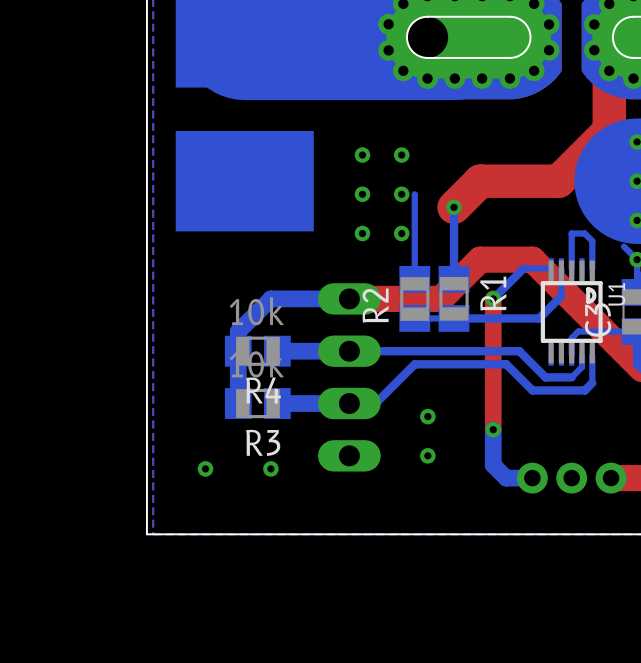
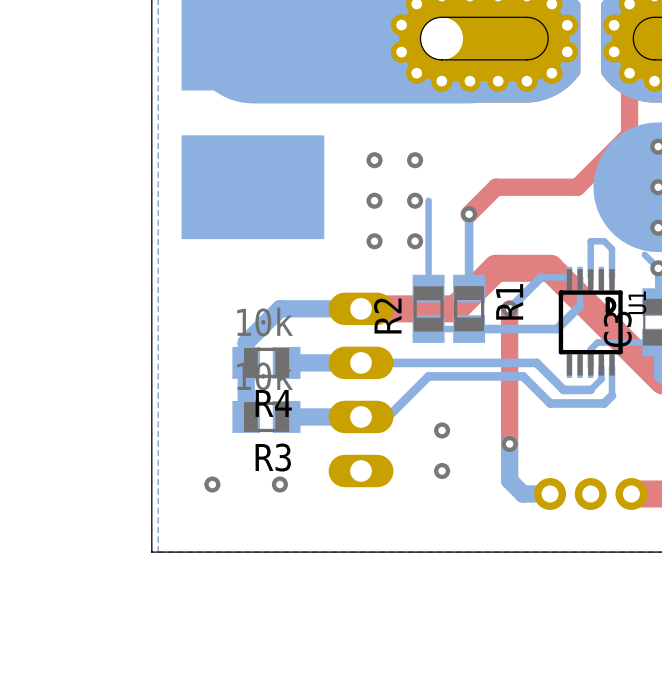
top track width: thick (609, 70) (609, 130) (558, 181) (480, 181) (454, 207) -> thin (629, 73) (629, 134) (577, 187) (496, 187) (469, 214)

